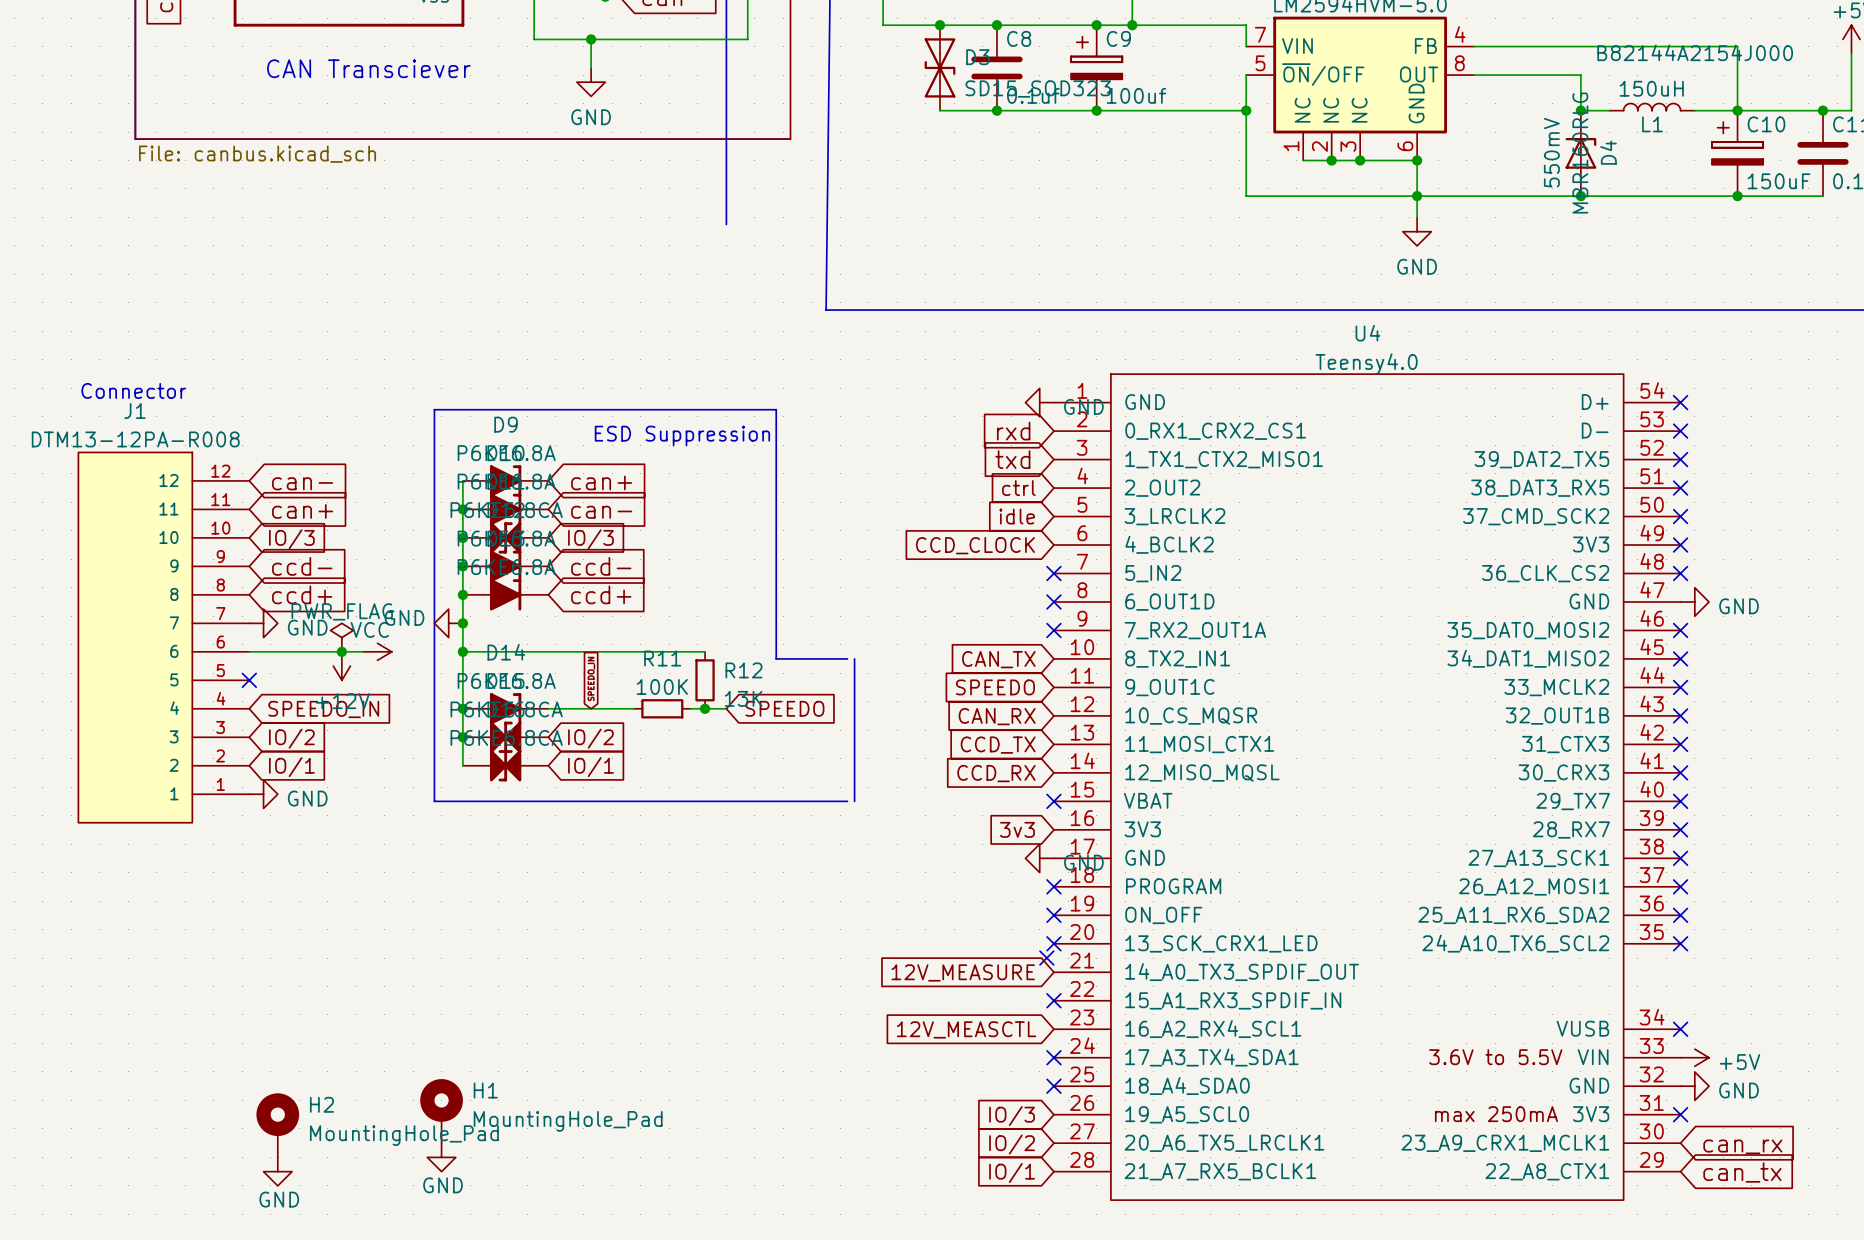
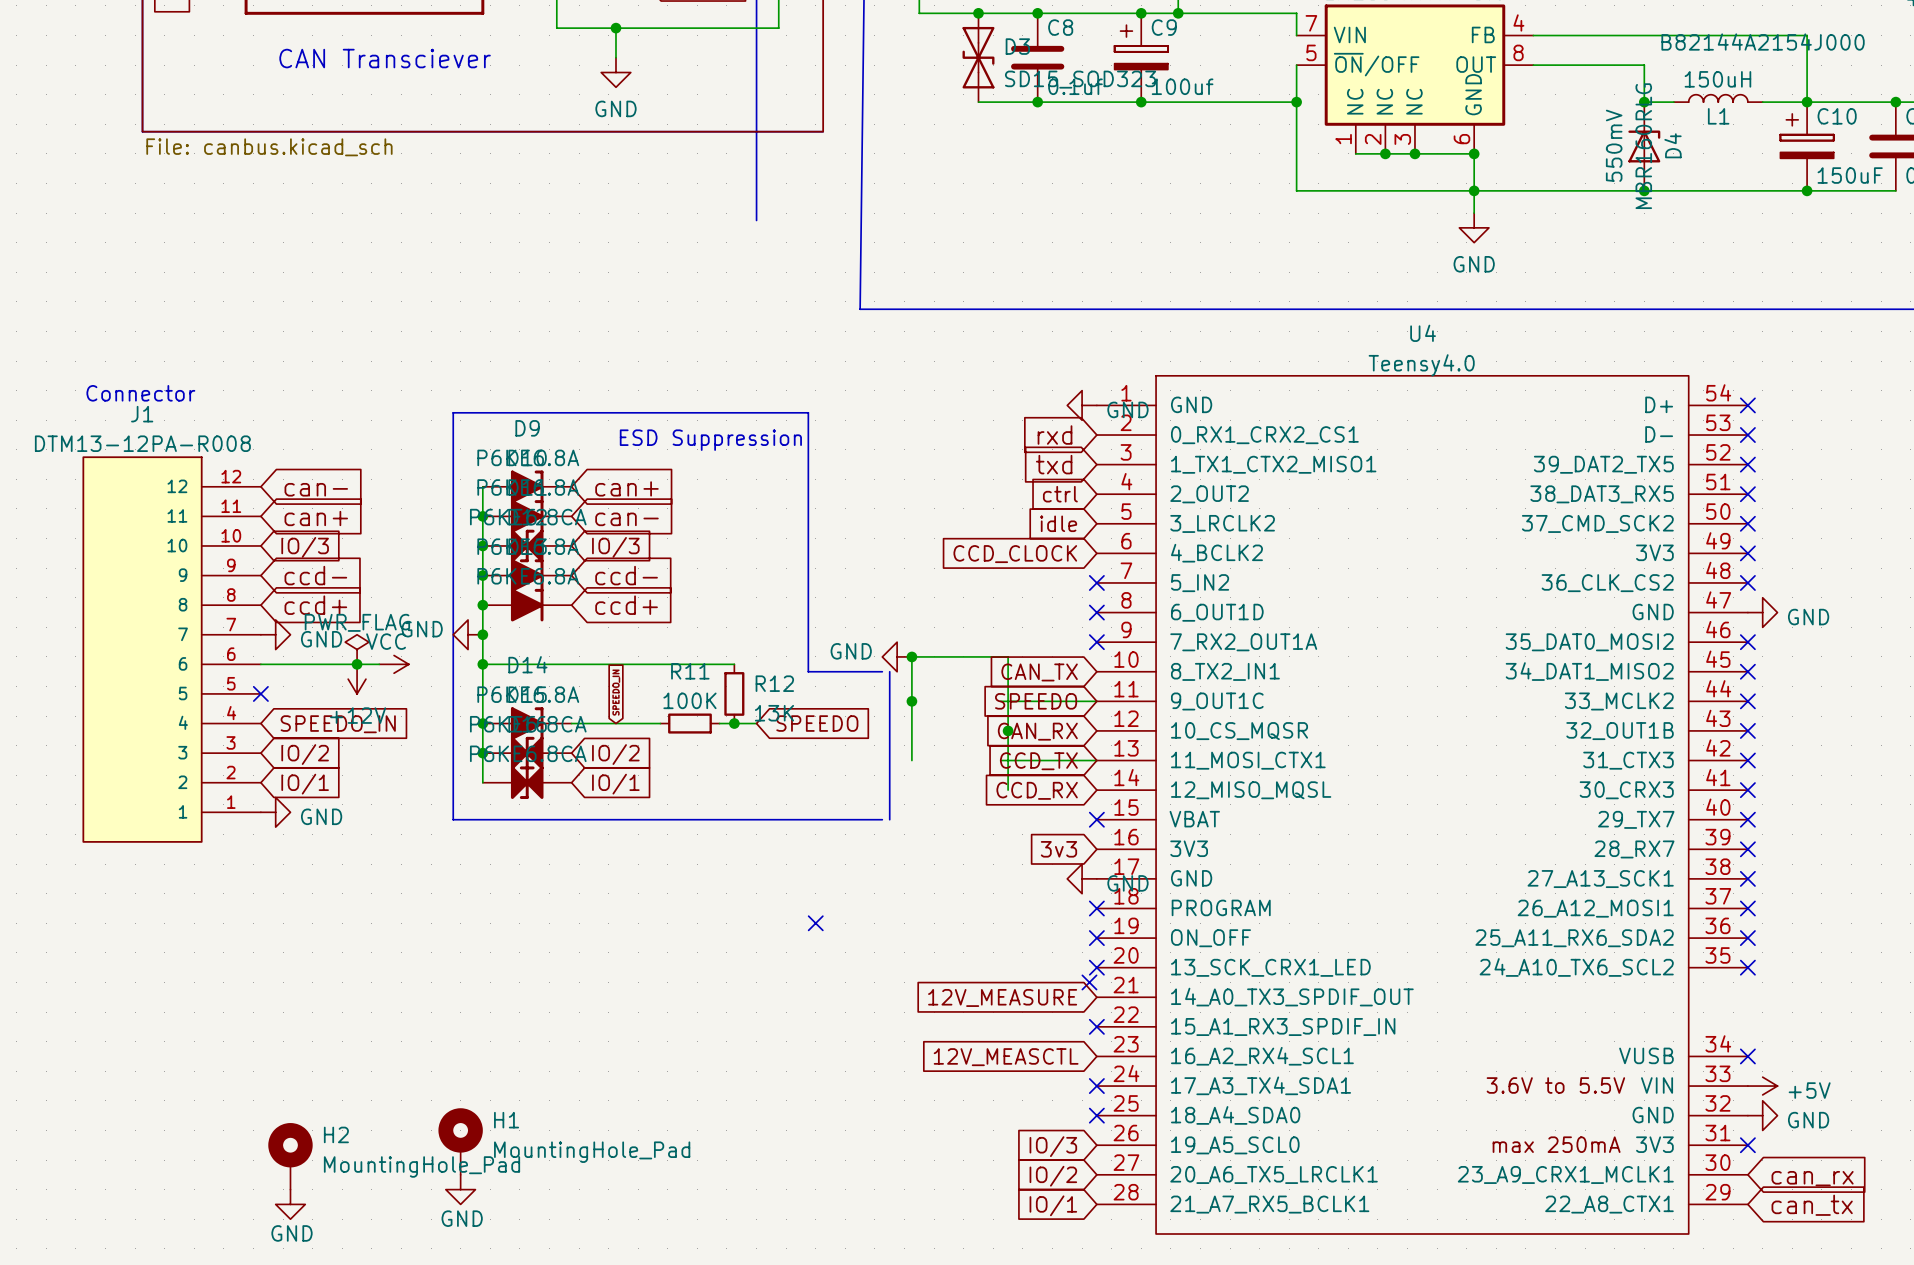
power symbol: none -> GND (897, 656)
junction: none -> (911, 656)
junction: none -> (911, 701)
wire: none -> (1000, 701) (1096, 701)
junction: none -> (1008, 730)
wire: none -> (911, 760) (911, 656) (1008, 656) (1008, 790)
wire: none -> (1000, 760) (1096, 760)
no-connect mark: none -> (815, 923)

